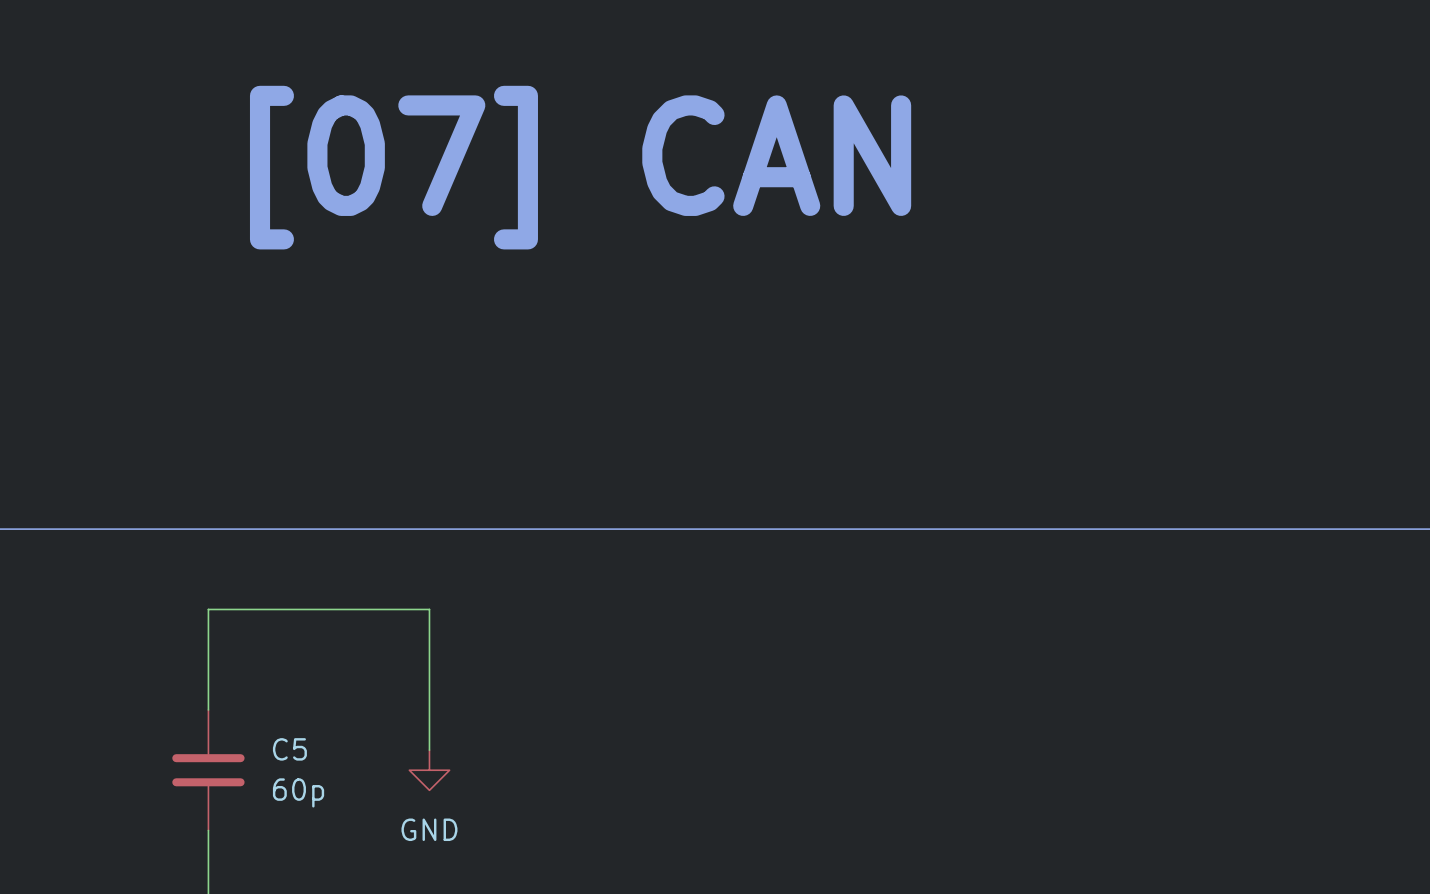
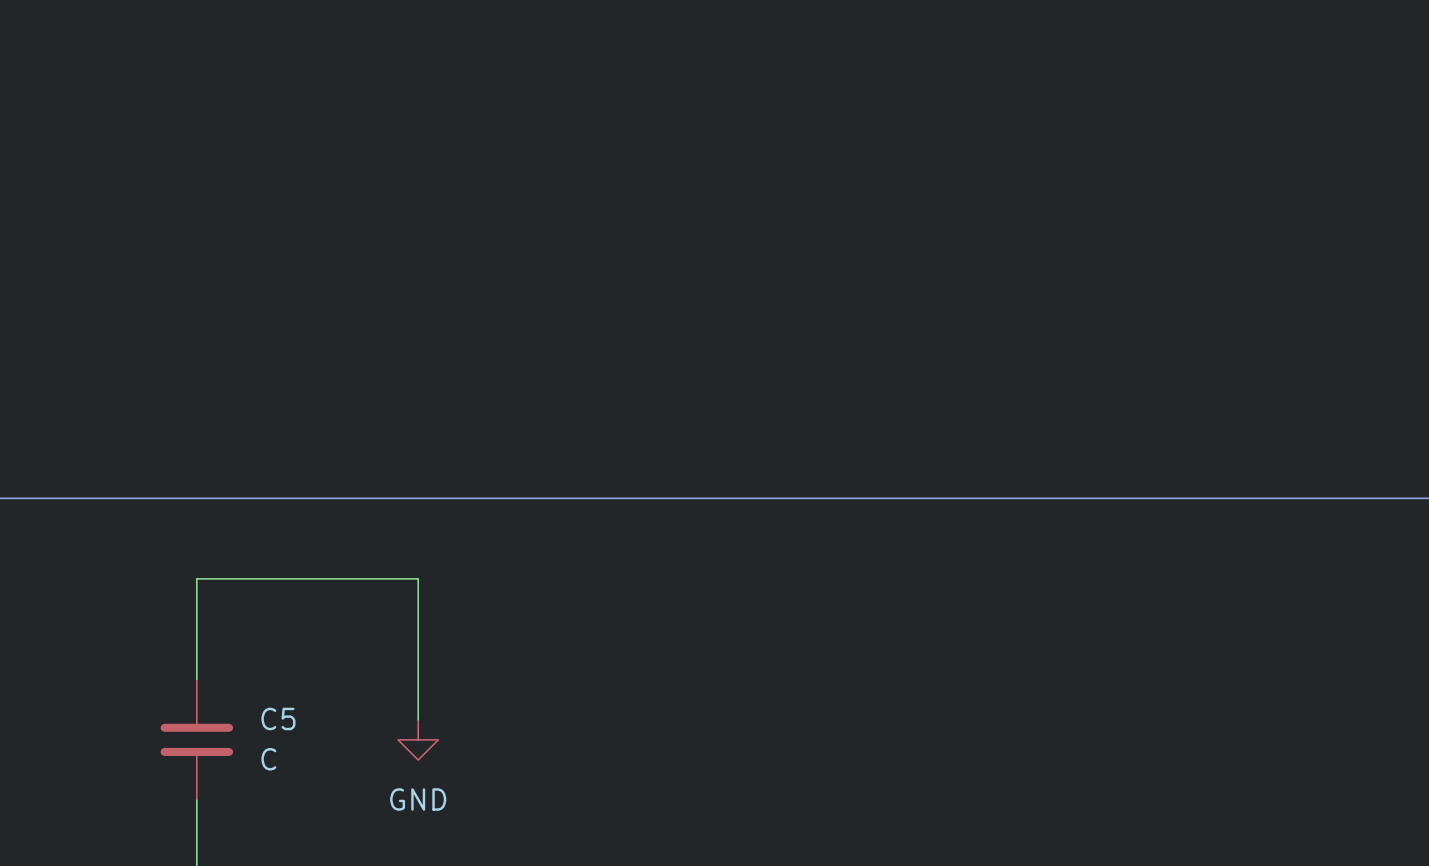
text: [07] CAN (580, 167) -> none
C5 value: 60p (298, 792) -> C (268, 759)

